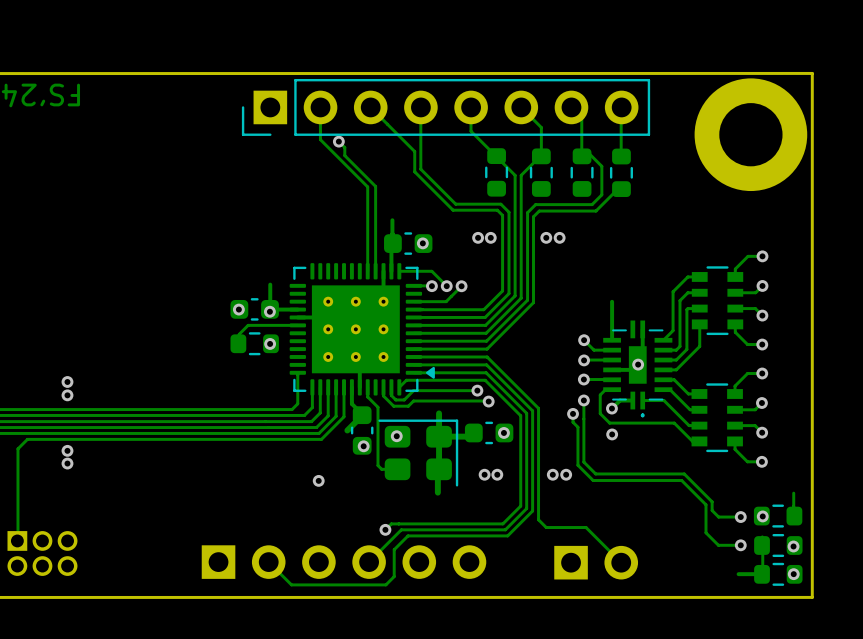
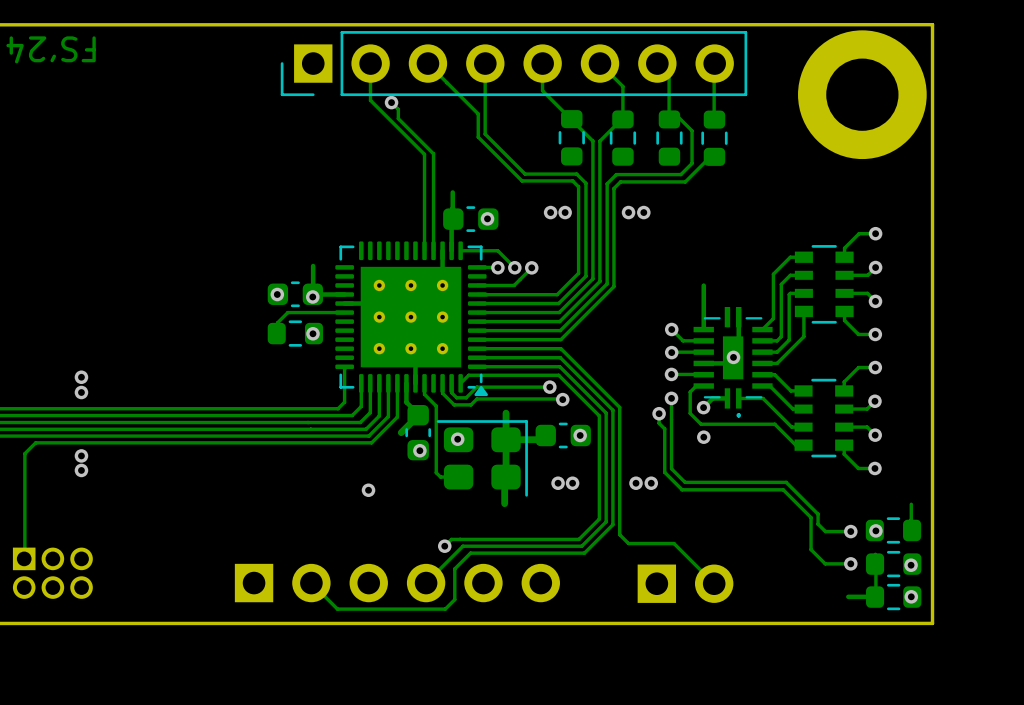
part footprint: [289, 263, 435, 396] -> [335, 241, 488, 397]

